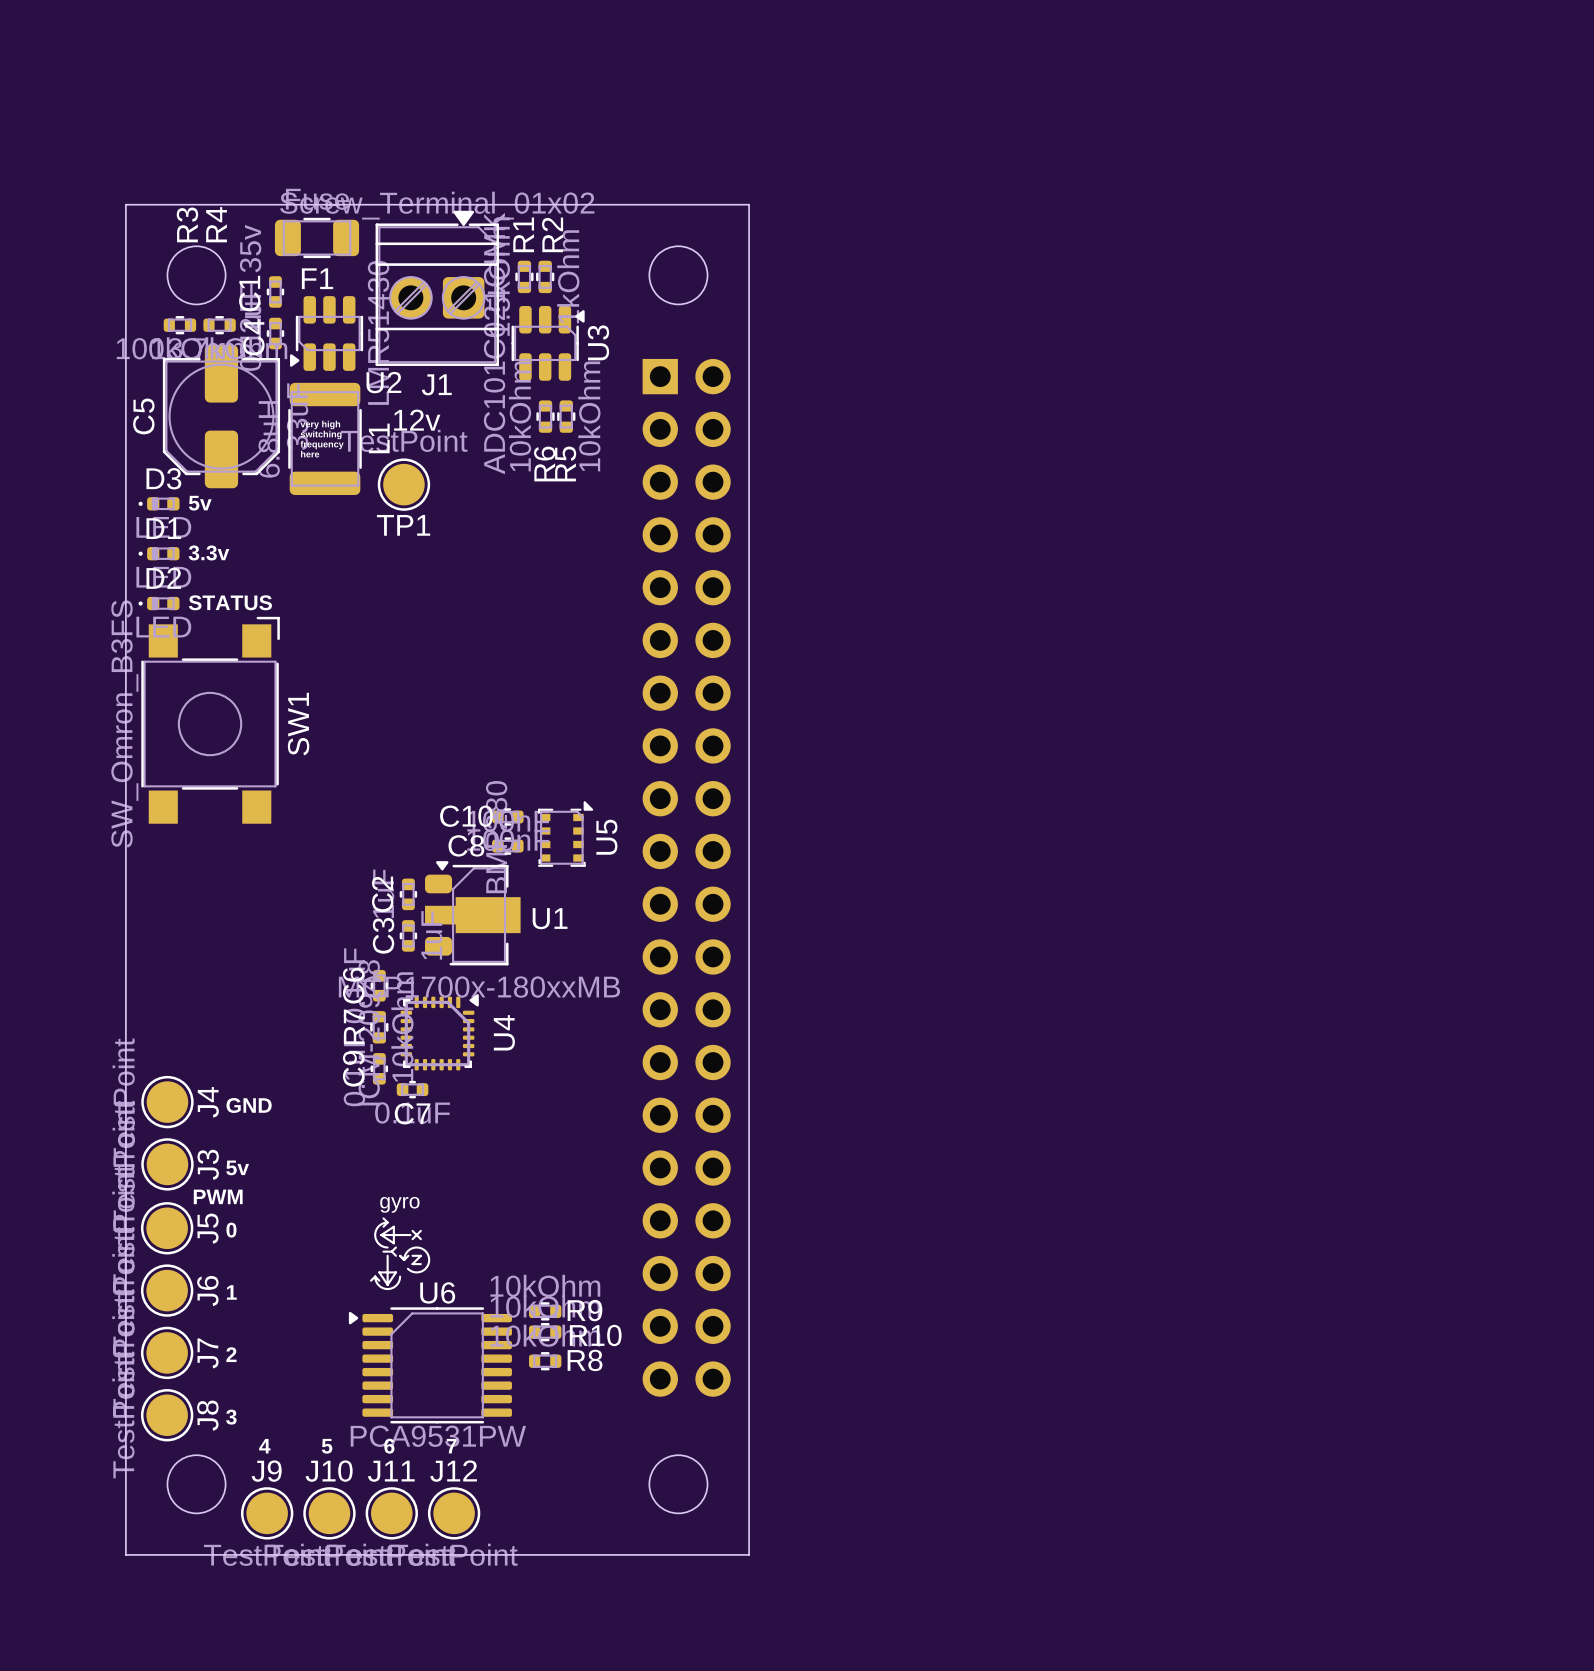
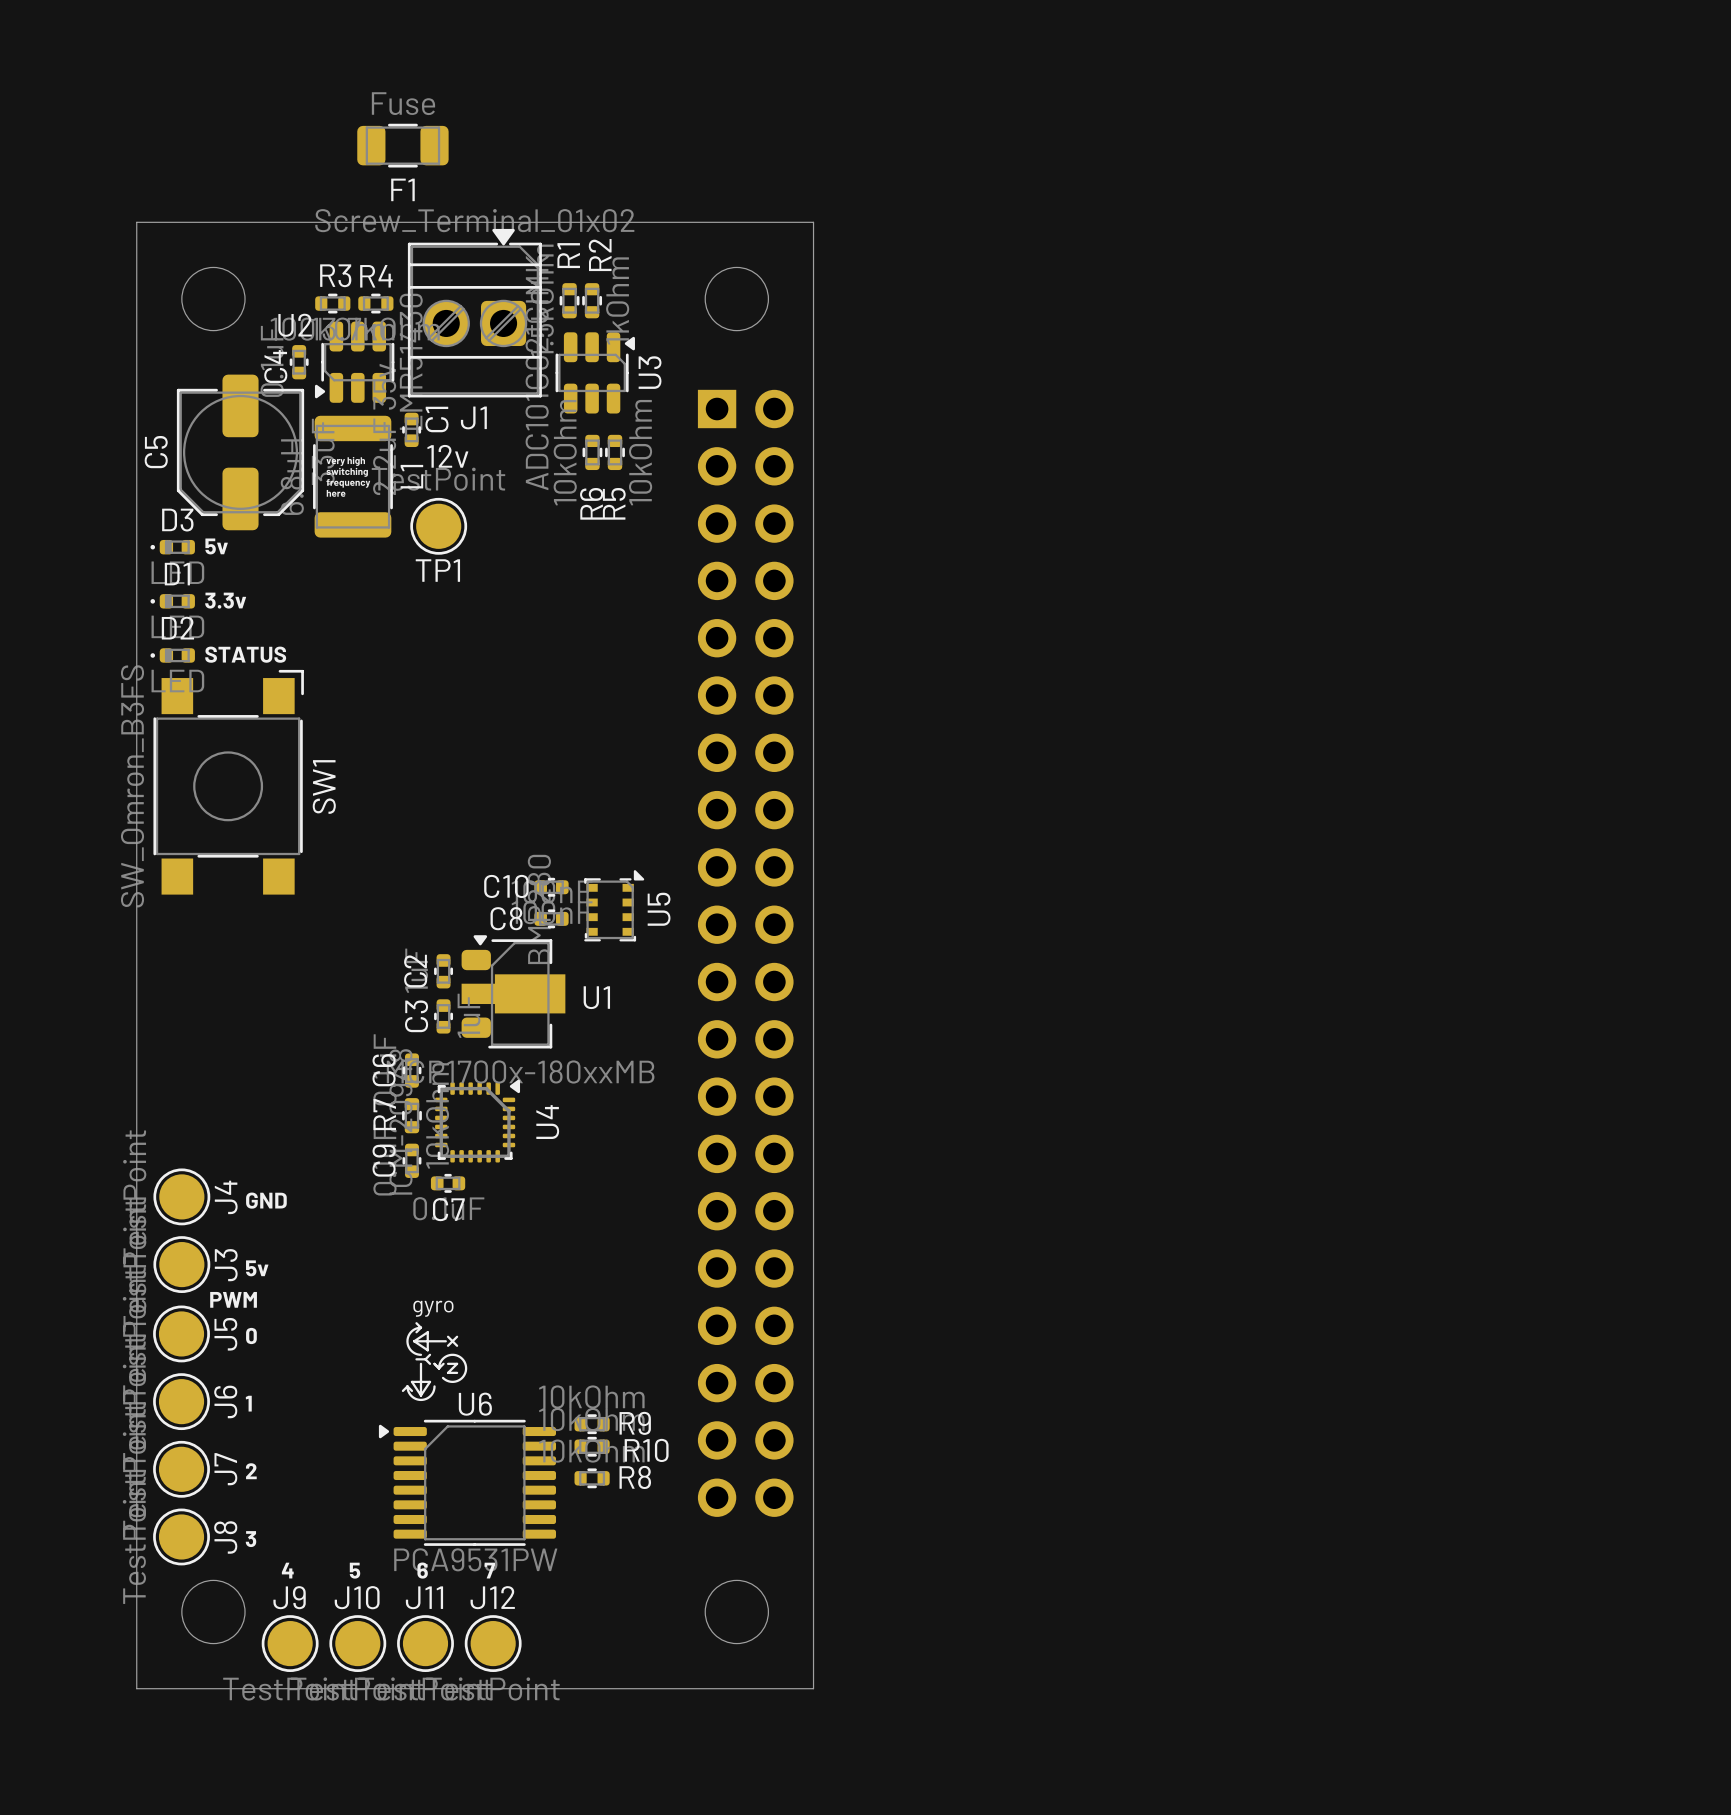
R3 name rotation: 0° (187, 224) -> 90° clockwise (335, 275)
R3 name position: R3 (187, 224) -> R3 (335, 275)
R4 name rotation: 0° (216, 224) -> 90° clockwise (376, 276)
R4 name position: R4 (216, 224) -> R4 (376, 276)
F1 position: (317, 237) -> (402, 145)
C1 position: (275, 291) -> (411, 429)
C1 name position: C1 (249, 293) -> C1 (436, 419)
R3 position: (179, 325) -> (332, 303)
R4 position: (219, 325) -> (375, 303)
U2 name position: U2 (383, 382) -> U2 (295, 325)

